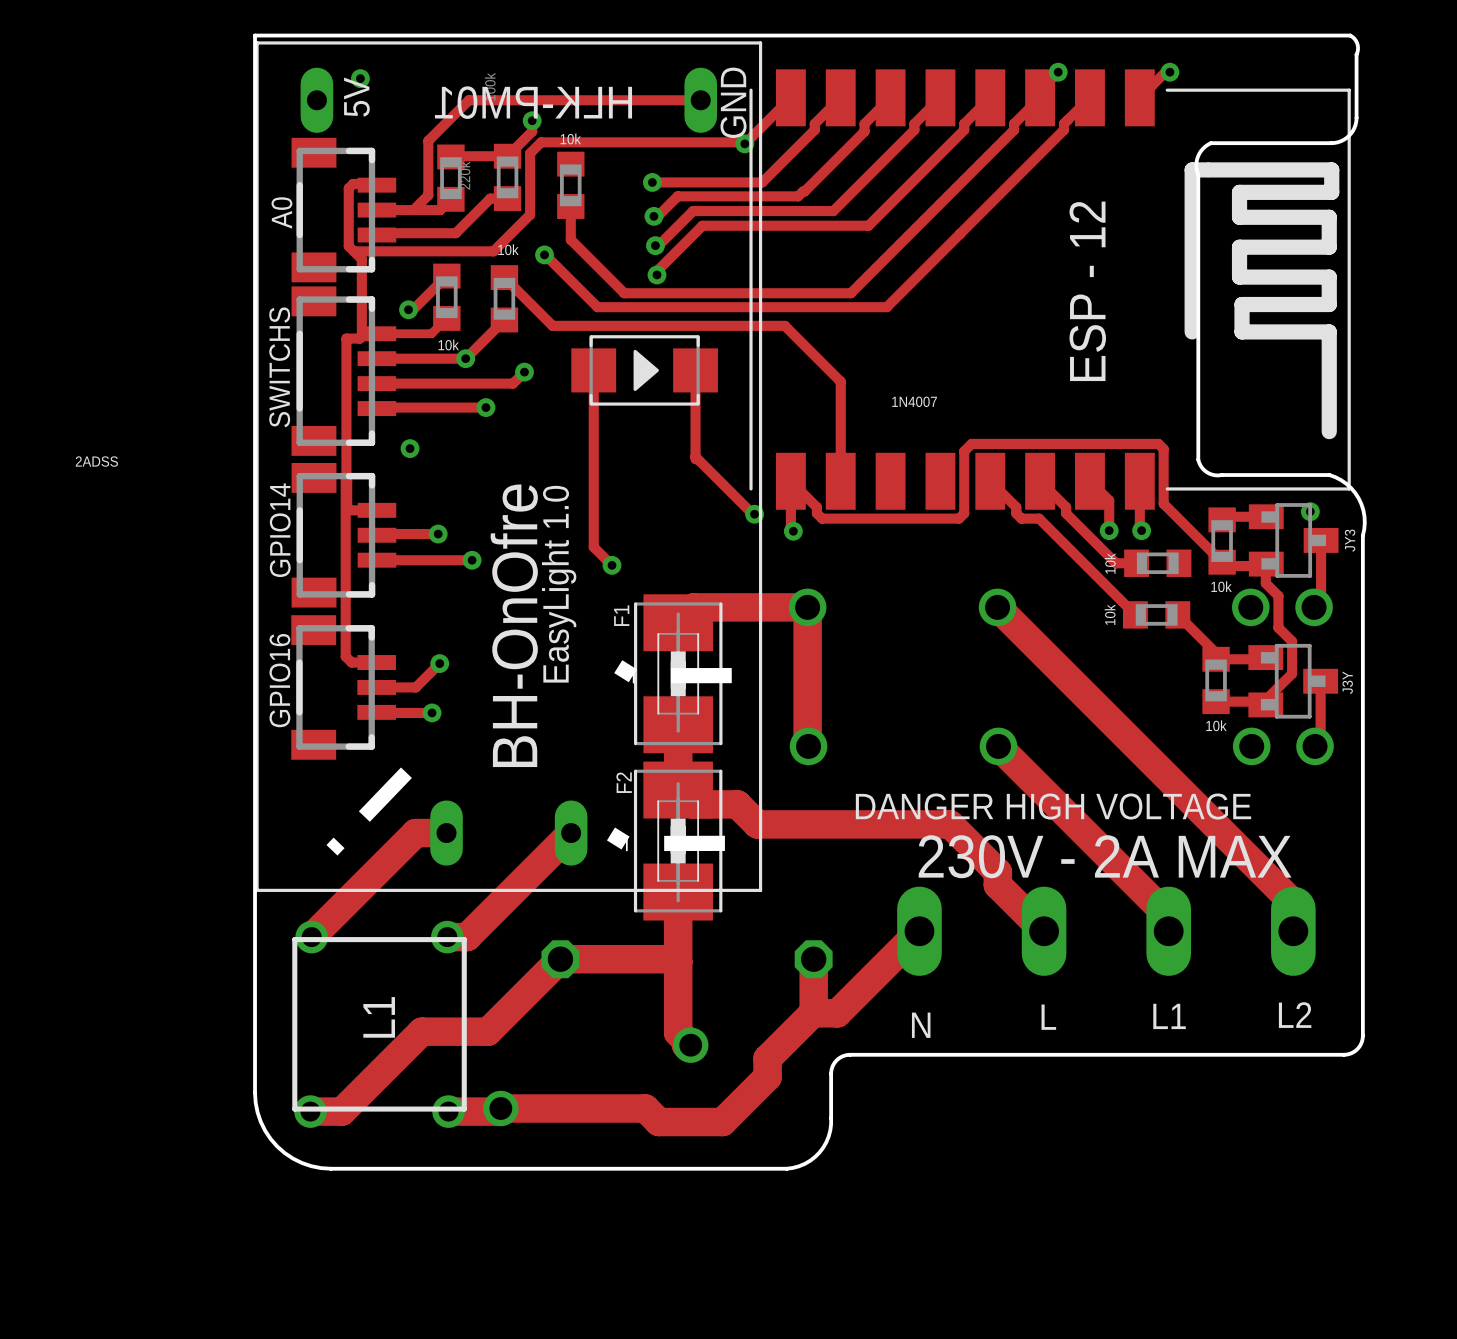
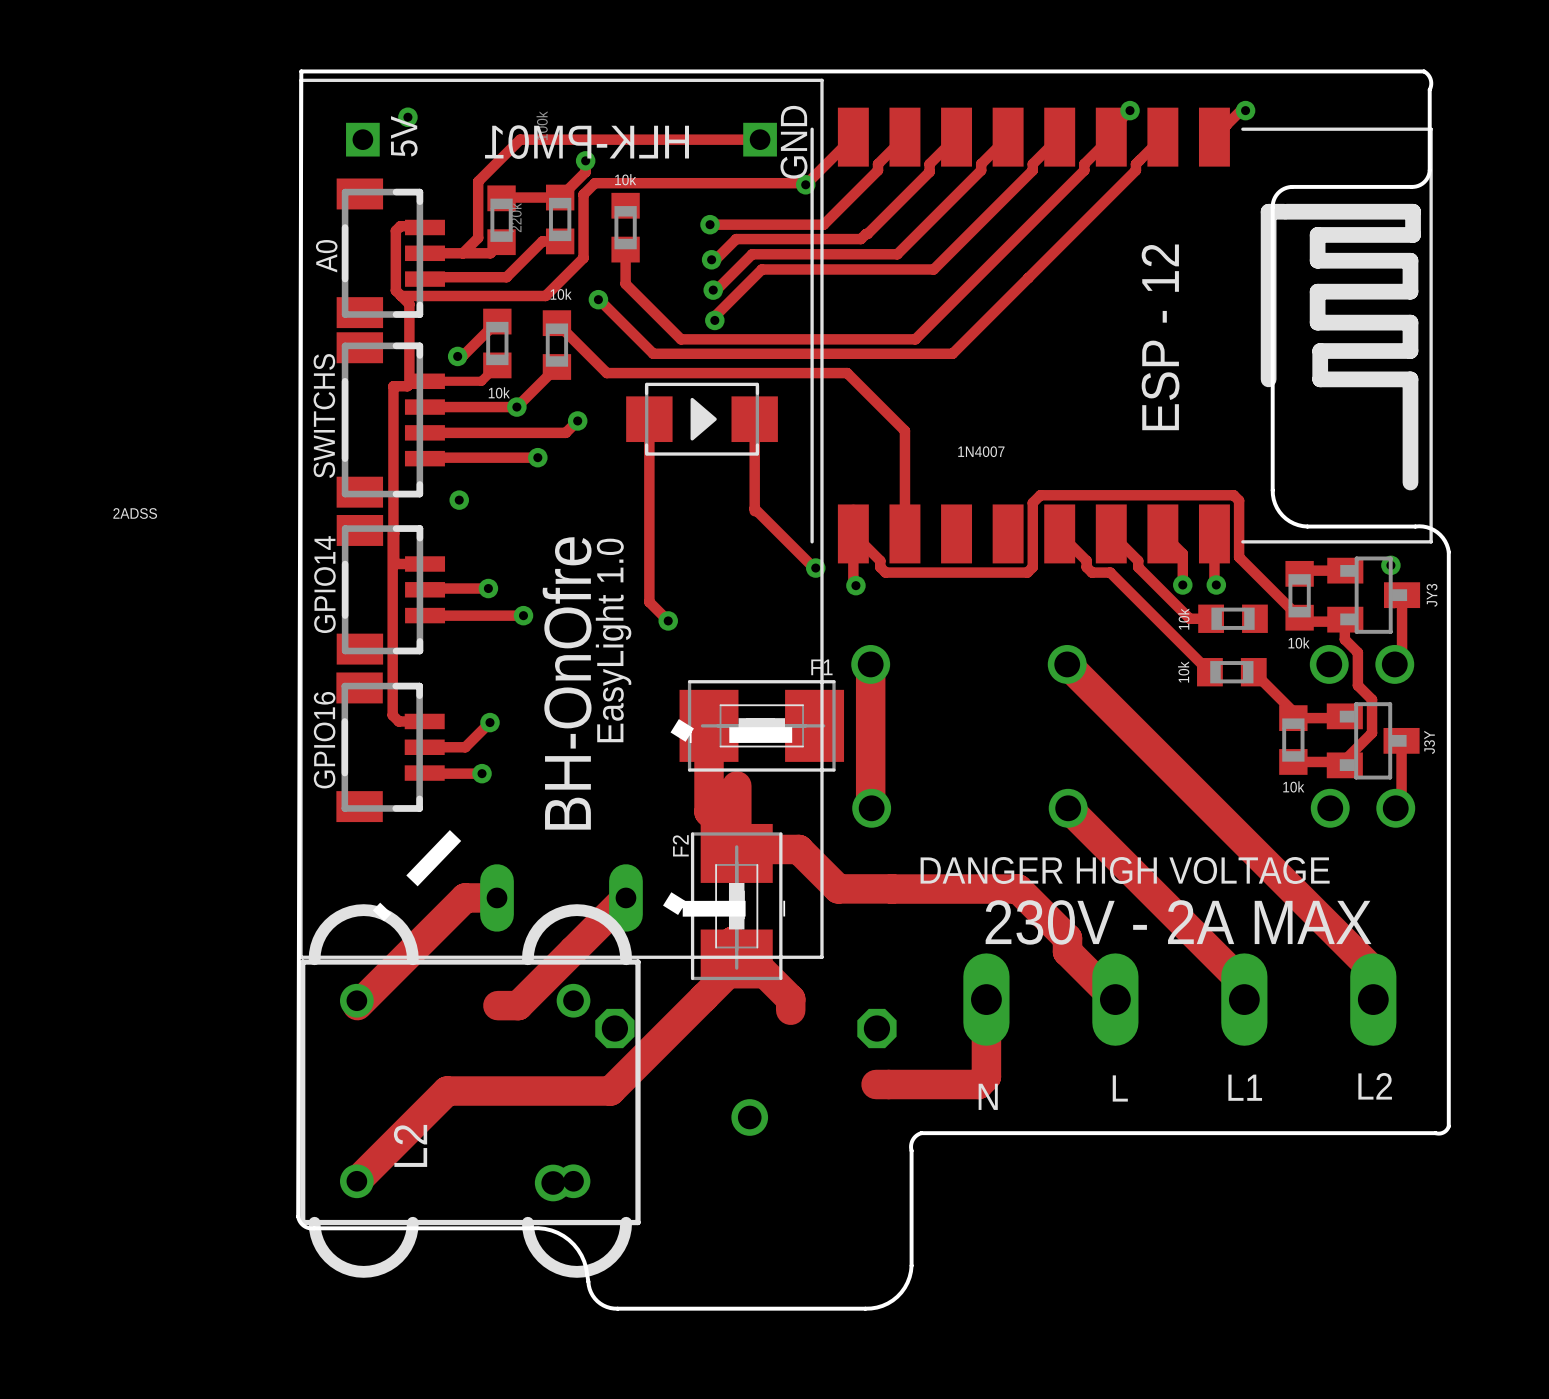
board edge: (255, 35) (255, 1092) (260, 1121) (277, 1146) (301, 1162) (330, 1168) (786, 1168) (798, 1166) (810, 1160) (819, 1152) (826, 1142) (831, 1124) (831, 1068) (836, 1060) (845, 1055) (1343, 1054) (1357, 1049) (1362, 1035) (1363, 510) (1358, 498) (1351, 488) (1341, 480) (1329, 475) (1216, 475) (1206, 472) (1200, 464) (1198, 459) (1198, 174) (1196, 165) (1199, 153) (1210, 143) (1331, 143) (1346, 137) (1353, 130) (1356, 121) (1358, 47) (1353, 37) (1350, 35) (255, 35) -> (301, 71) (298, 1216) (302, 1224) (312, 1228) (538, 1228) (551, 1230) (563, 1236) (578, 1249) (584, 1261) (589, 1288) (594, 1298) (603, 1305) (613, 1308) (871, 1308) (887, 1303) (897, 1296) (904, 1287) (909, 1277) (911, 1265) (911, 1145) (915, 1136) (921, 1133) (1438, 1133) (1446, 1129) (1448, 1126) (1448, 548) (1445, 541) (1437, 532) (1423, 526) (1298, 525) (1285, 518) (1279, 512) (1273, 499) (1272, 490) (1273, 199) (1279, 191) (1289, 187) (1413, 186) (1424, 182) (1429, 170) (1431, 82) (1426, 73) (1424, 71) (301, 71)
part footprint: [255, 41, 763, 892] -> [299, 78, 824, 959]
track: (807, 607) (693, 607) (678, 622) (692, 637) -> none
F1 rotation: 0° (678, 673) -> 90° clockwise (761, 725)
track: (678, 790) (692, 804) (737, 804) (757, 824) (828, 824) -> (709, 725) (709, 811) (745, 849) (798, 849) (838, 888) (891, 888)
track: (690, 904) (678, 892) (678, 1032) (690, 1045) (685, 1045) -> none
track: (919, 931) (837, 1013) -> (986, 999) (986, 1076) (978, 1084) (901, 1084)
track: none -> (790, 1010) (790, 999) (732, 941) (732, 968) (610, 1091) (447, 1091) (356, 1181)
track: (813, 959) (813, 1012) (767, 1058) (767, 1077) (722, 1122) (658, 1122) (645, 1108) (500, 1108) (497, 1111) (448, 1111) -> none
track: (678, 962) (675, 959) (560, 959) (488, 1031) (421, 1031) (341, 1111) (310, 1111) -> none
L2: none -> (470, 1091)
L1: (379, 1024) -> none

